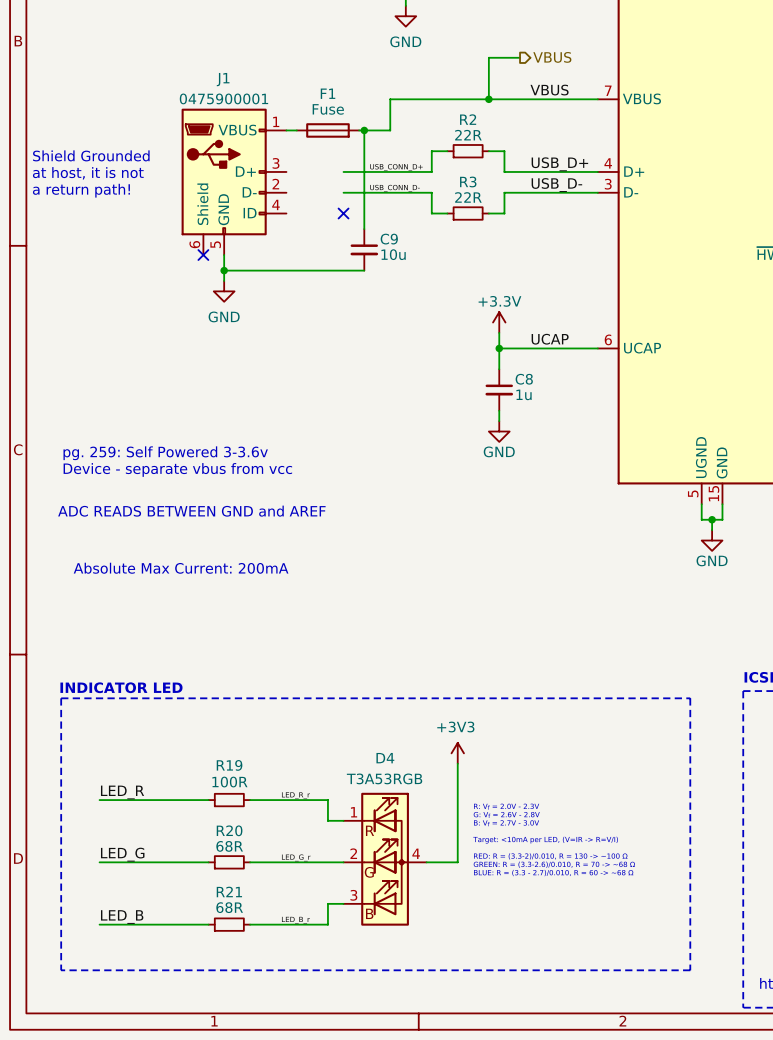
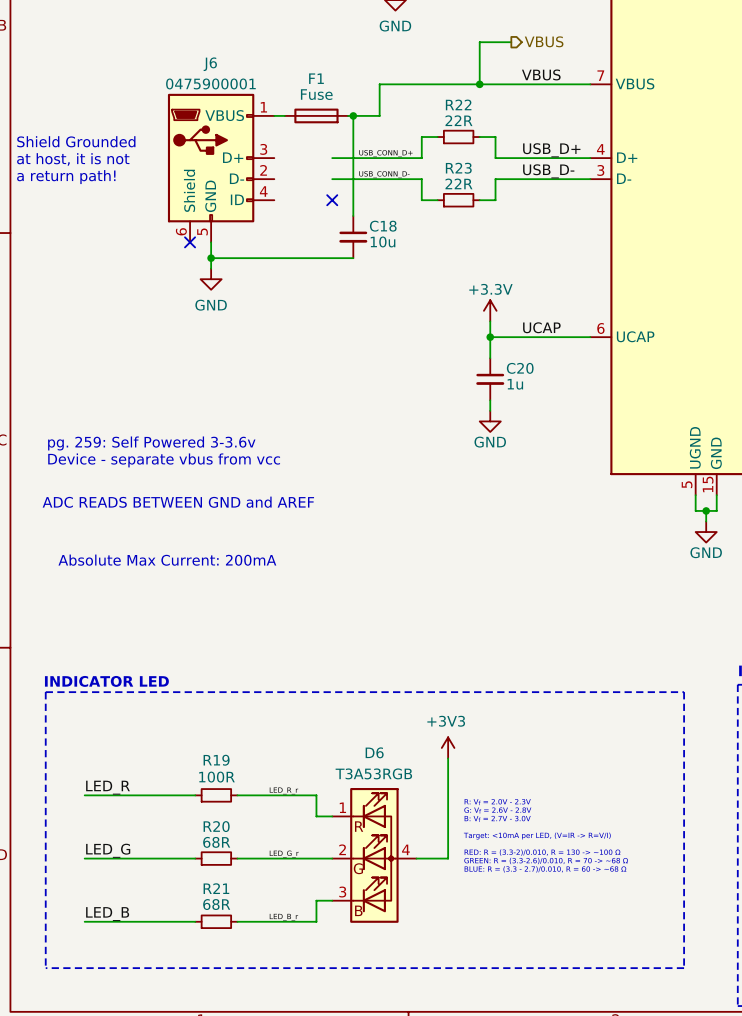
J1 name: J1 (223, 79) -> J6 (210, 64)
R2 name: R2 (468, 119) -> R22 (458, 104)
R3 name: R3 (468, 181) -> R23 (458, 168)
C9 name: C9 (389, 239) -> C18 (383, 226)
C8 name: C8 (524, 379) -> C20 (520, 368)
D4 name: D4 (385, 758) -> D6 (374, 752)

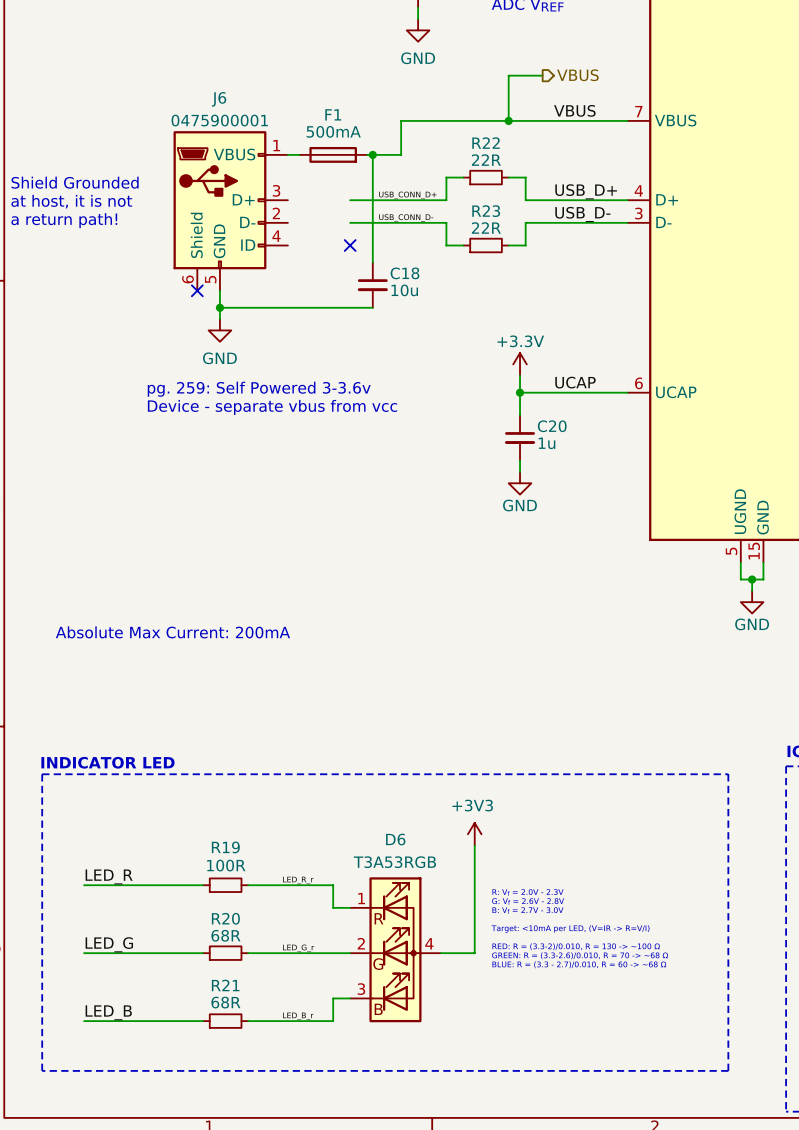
F1 value: Fuse (316, 94) -> 500mA (333, 131)
text position: pg. 259: Self Powered 3-3.6v (151, 443) -> pg. 259: Self Powered 3-3.6v (259, 389)
text position: Device - separate vbus from vcc (164, 460) -> Device - separate vbus from vcc (272, 407)
text: ADC READS BETWEEN GND and AREF (178, 502) -> none

